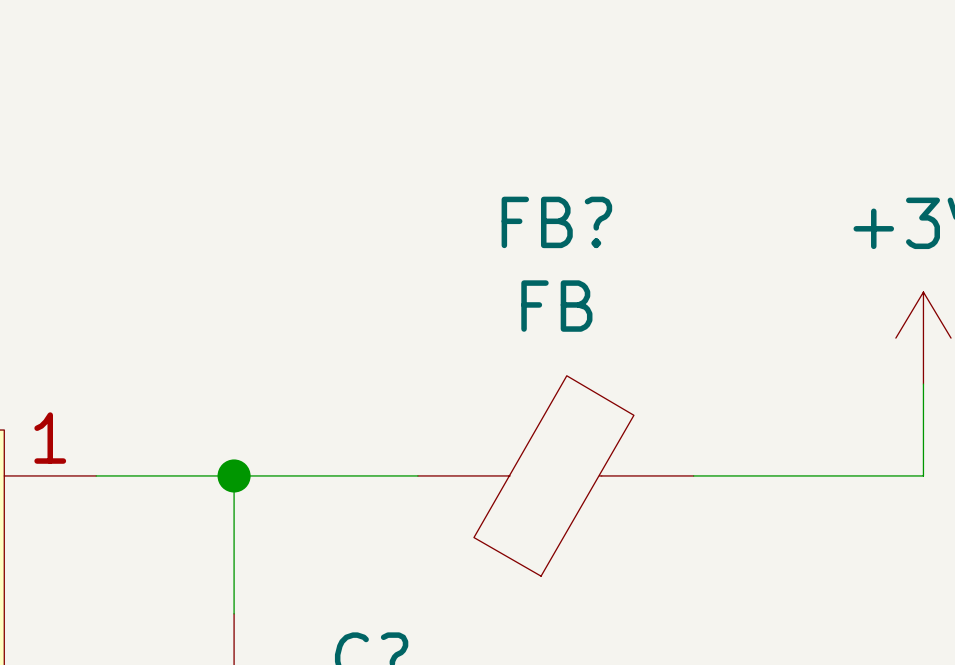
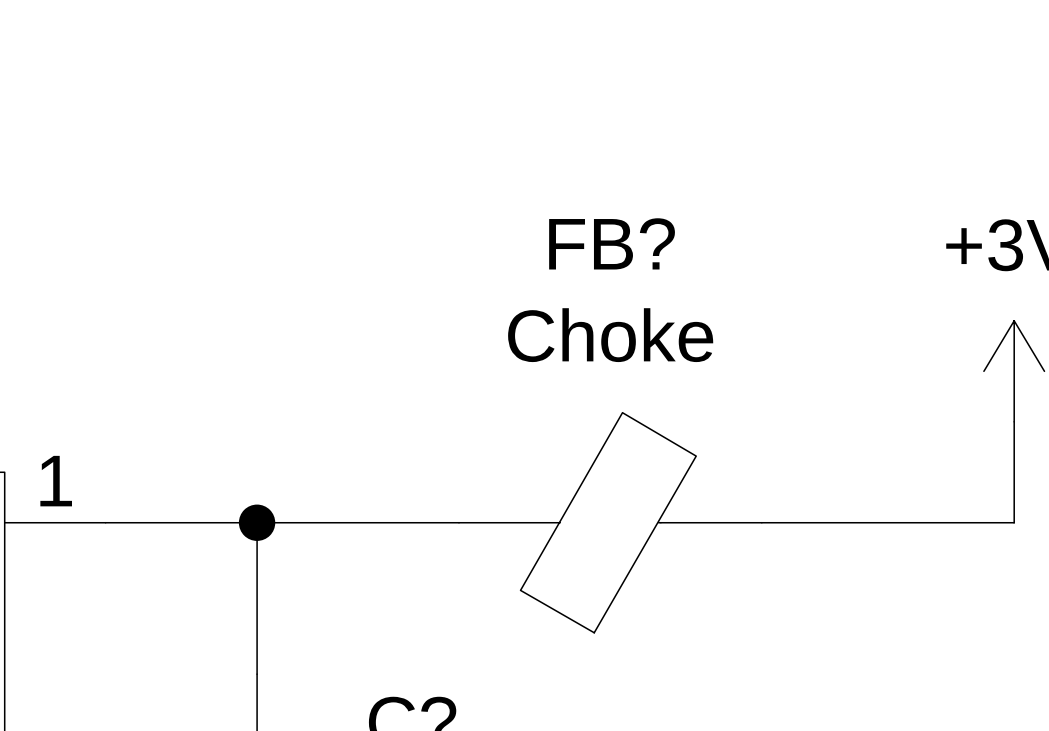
FB? value: FB (556, 306) -> Choke (610, 335)

